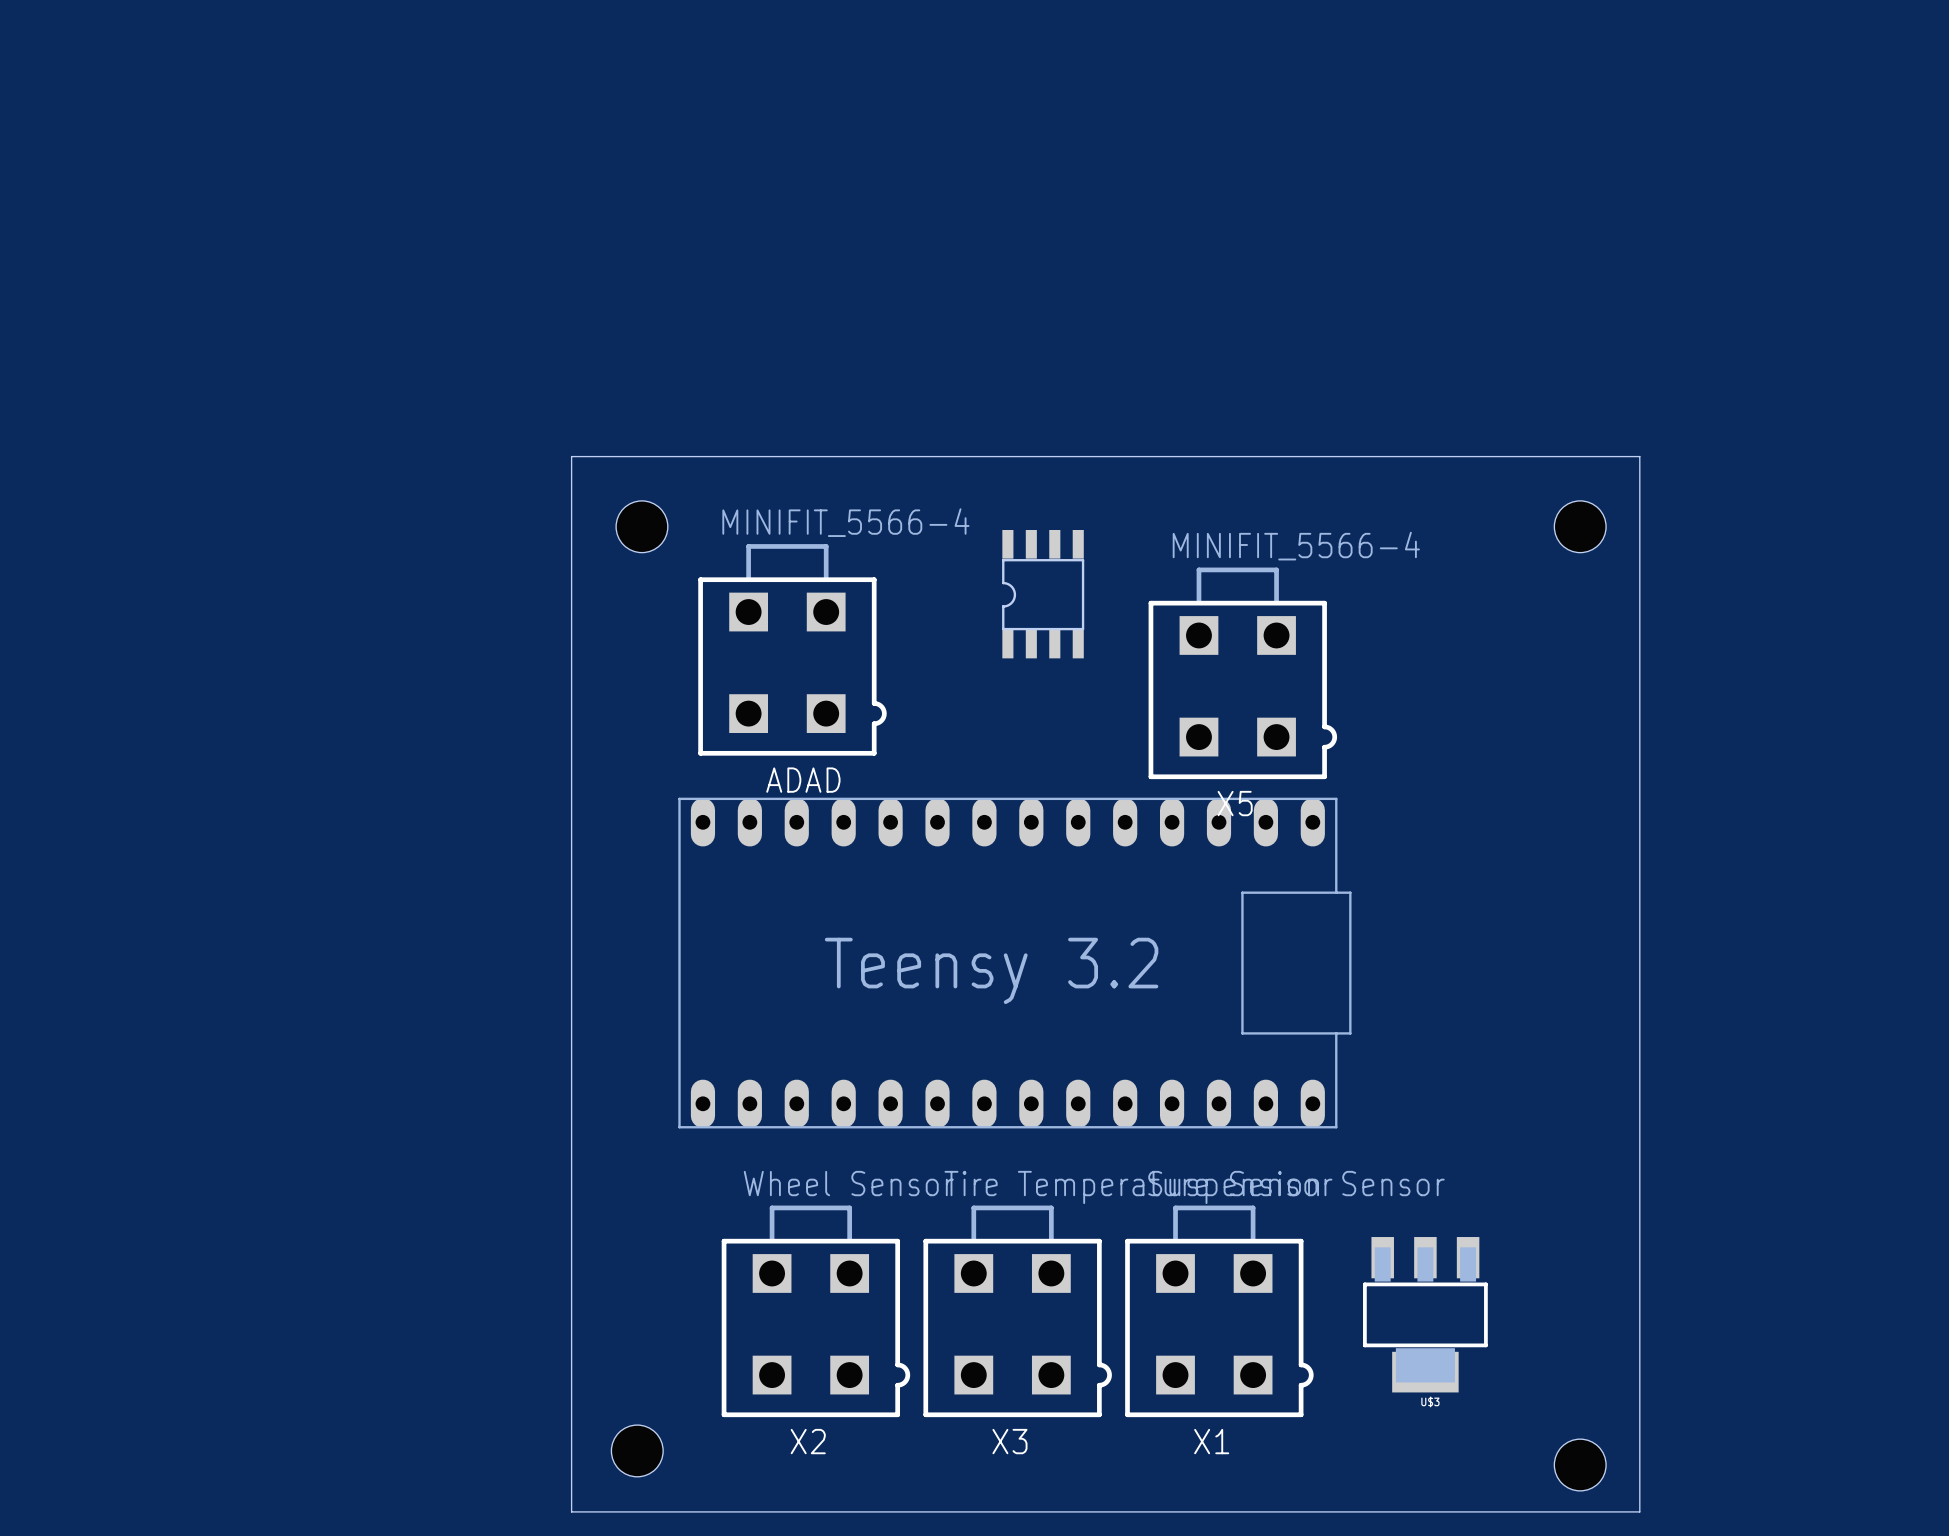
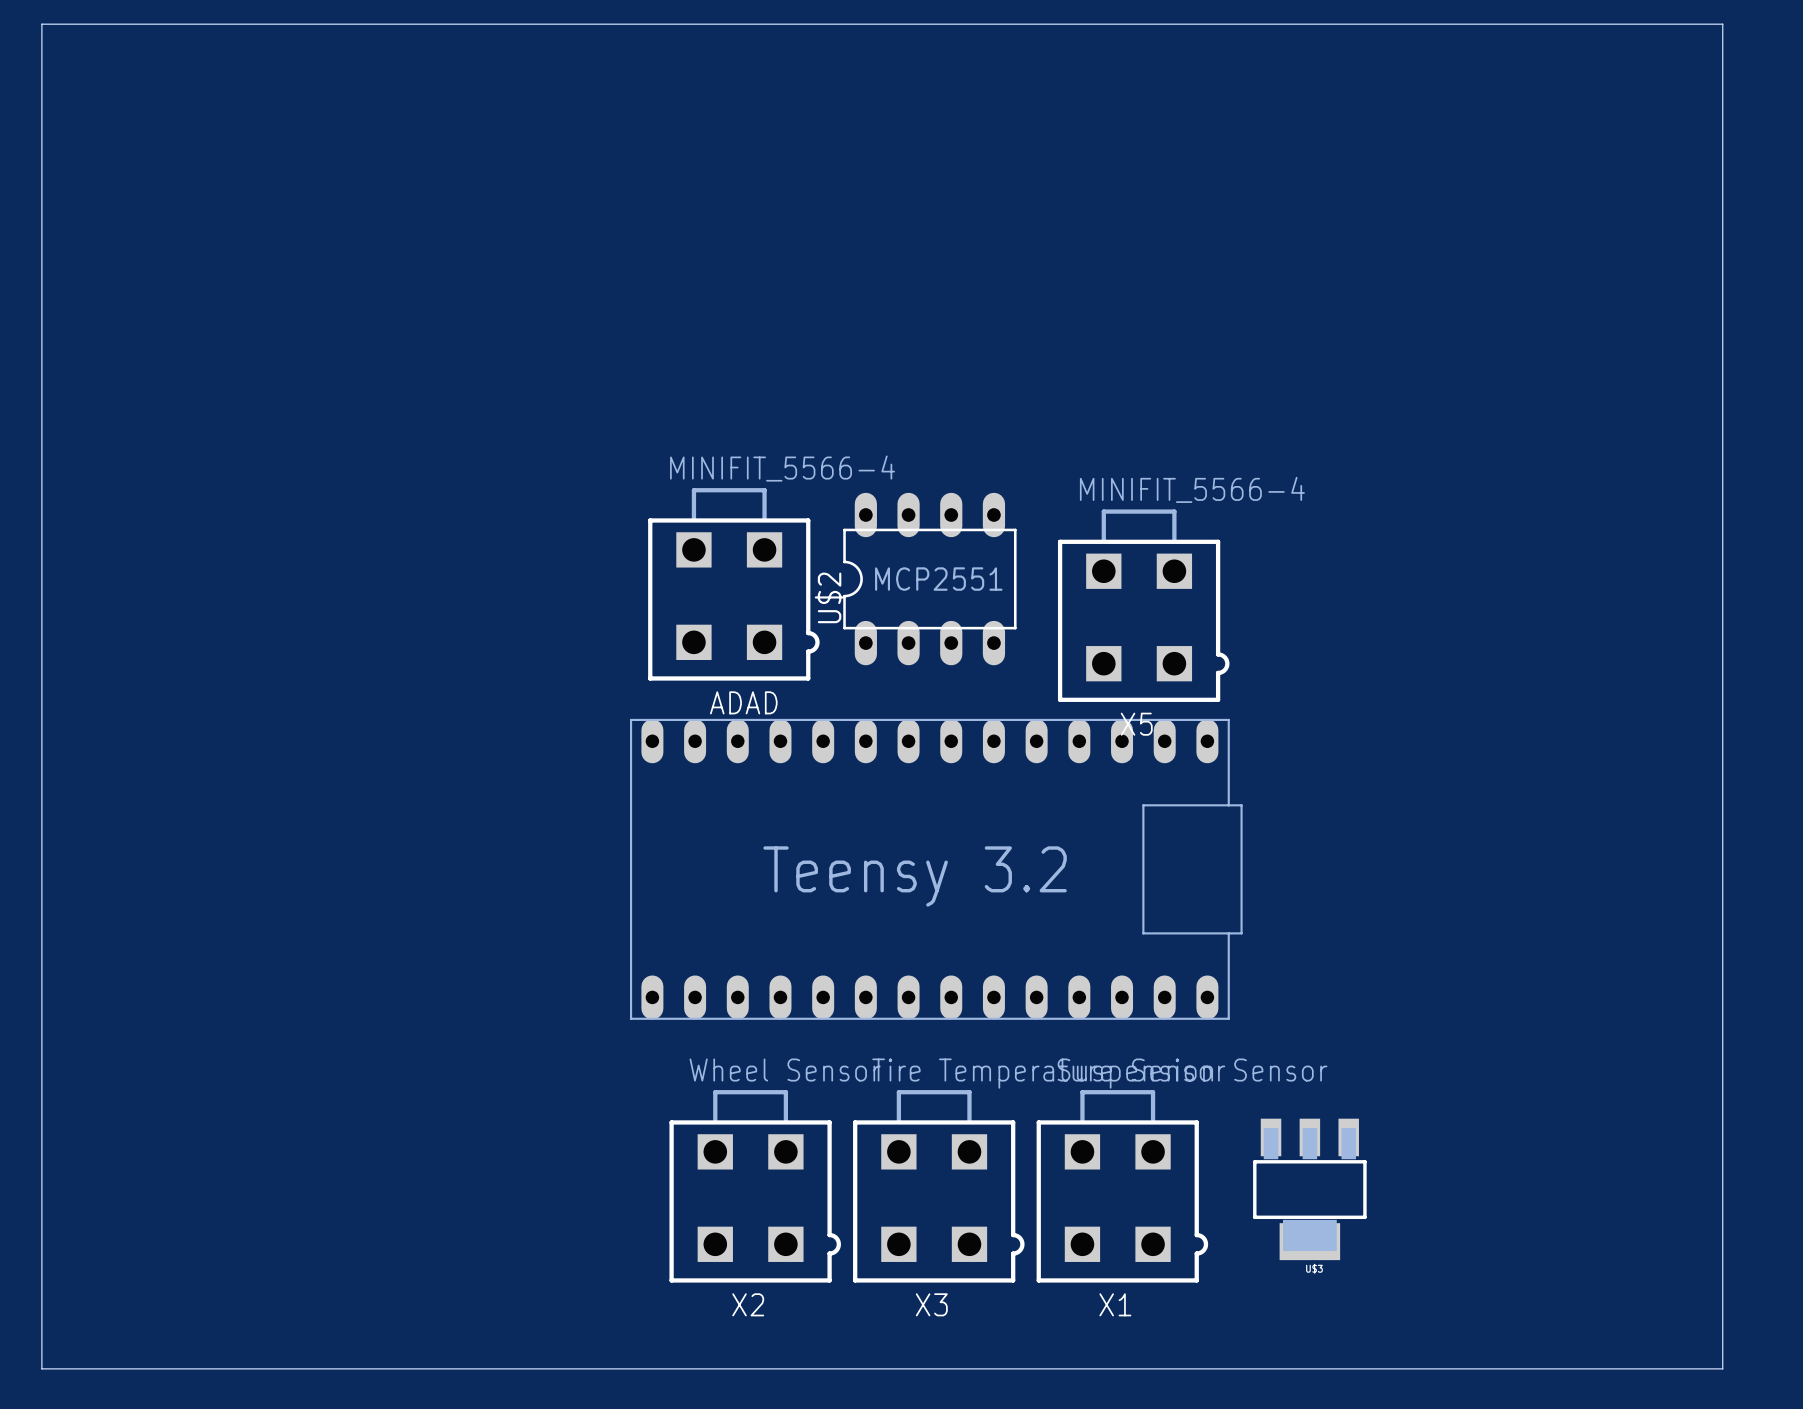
hole: (641, 526) -> none
hole: (1580, 526) -> none
part: (1043, 594) -> none
U$2: none -> MCP2551 (929, 579)
hole: (637, 1450) -> none
hole: (1580, 1465) -> none
board edge: (571, 1511) (571, 456) (1639, 456) (1639, 1511) -> (532, 1368) (41, 1368) (41, 24) (1722, 24) (1722, 1368) (1504, 1368)

